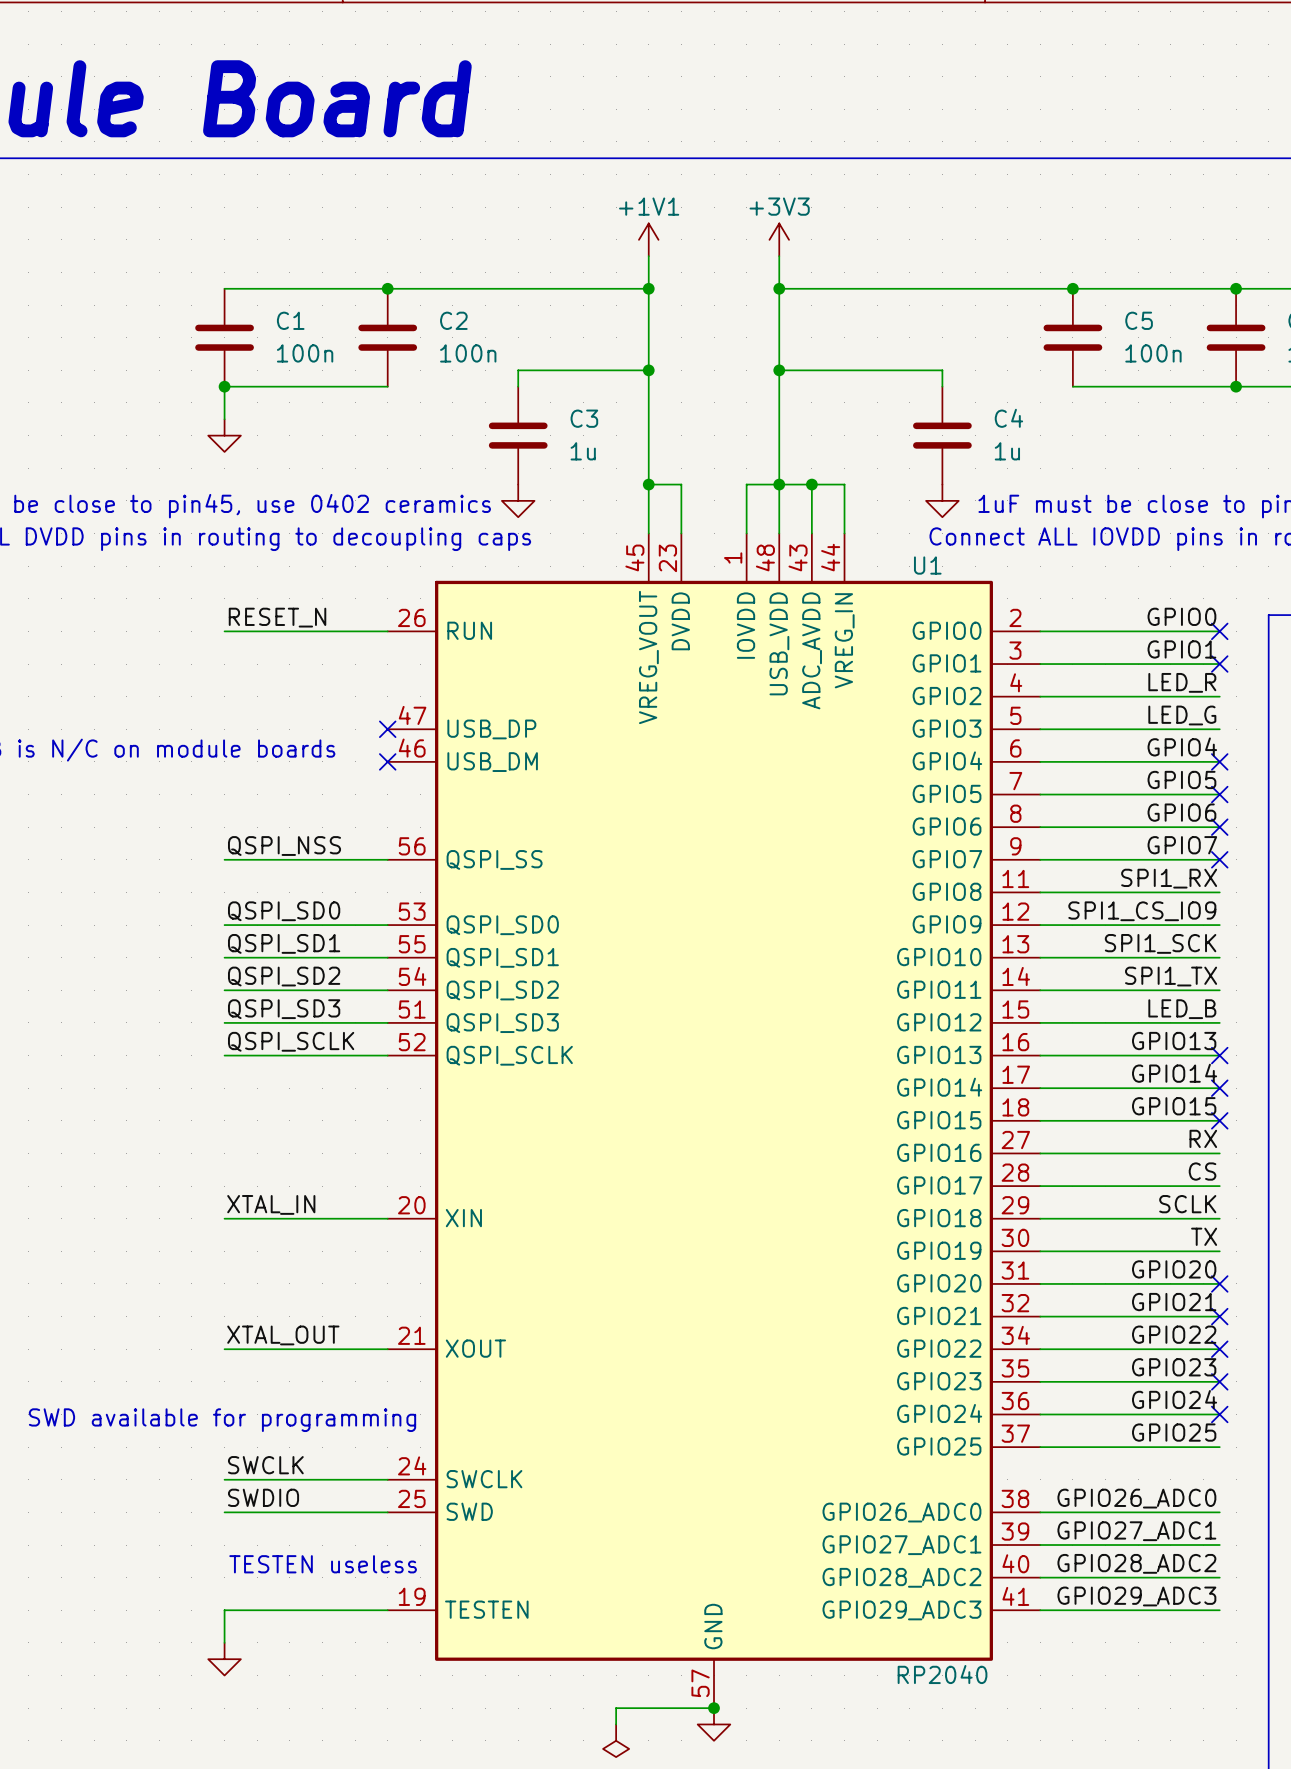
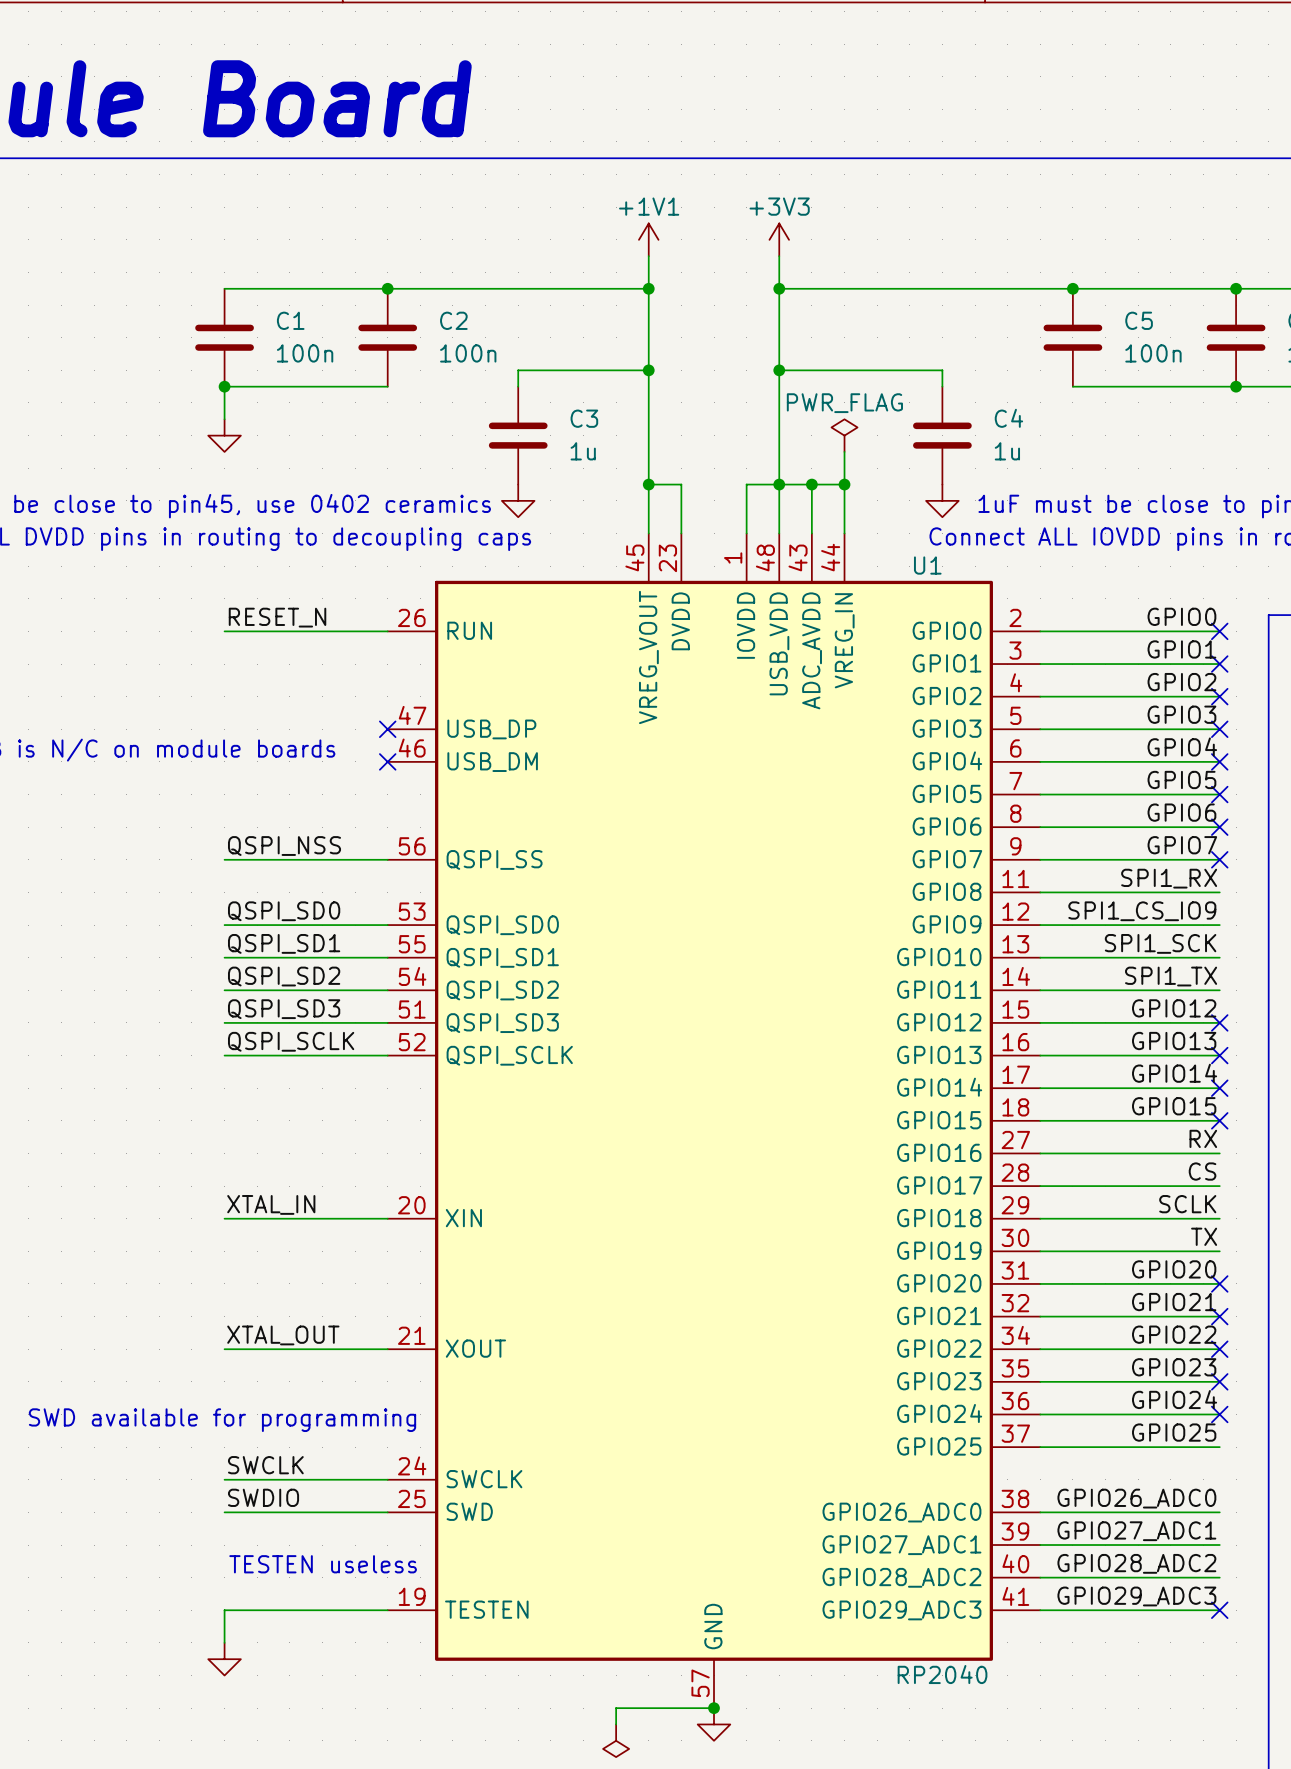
power symbol: none -> PWR_FLAG (844, 435)
wire: none -> (844, 451) (844, 484)
junction: none -> (844, 484)
label: LED_R (1182, 682) -> GPIO2 (1181, 682)
no-connect mark: none -> (1219, 696)
label: LED_G (1182, 715) -> GPIO3 (1181, 714)
no-connect mark: none -> (1219, 729)
label: LED_B (1182, 1009) -> GPIO12 (1174, 1008)
no-connect mark: none -> (1219, 1022)
no-connect mark: none -> (1219, 1610)

